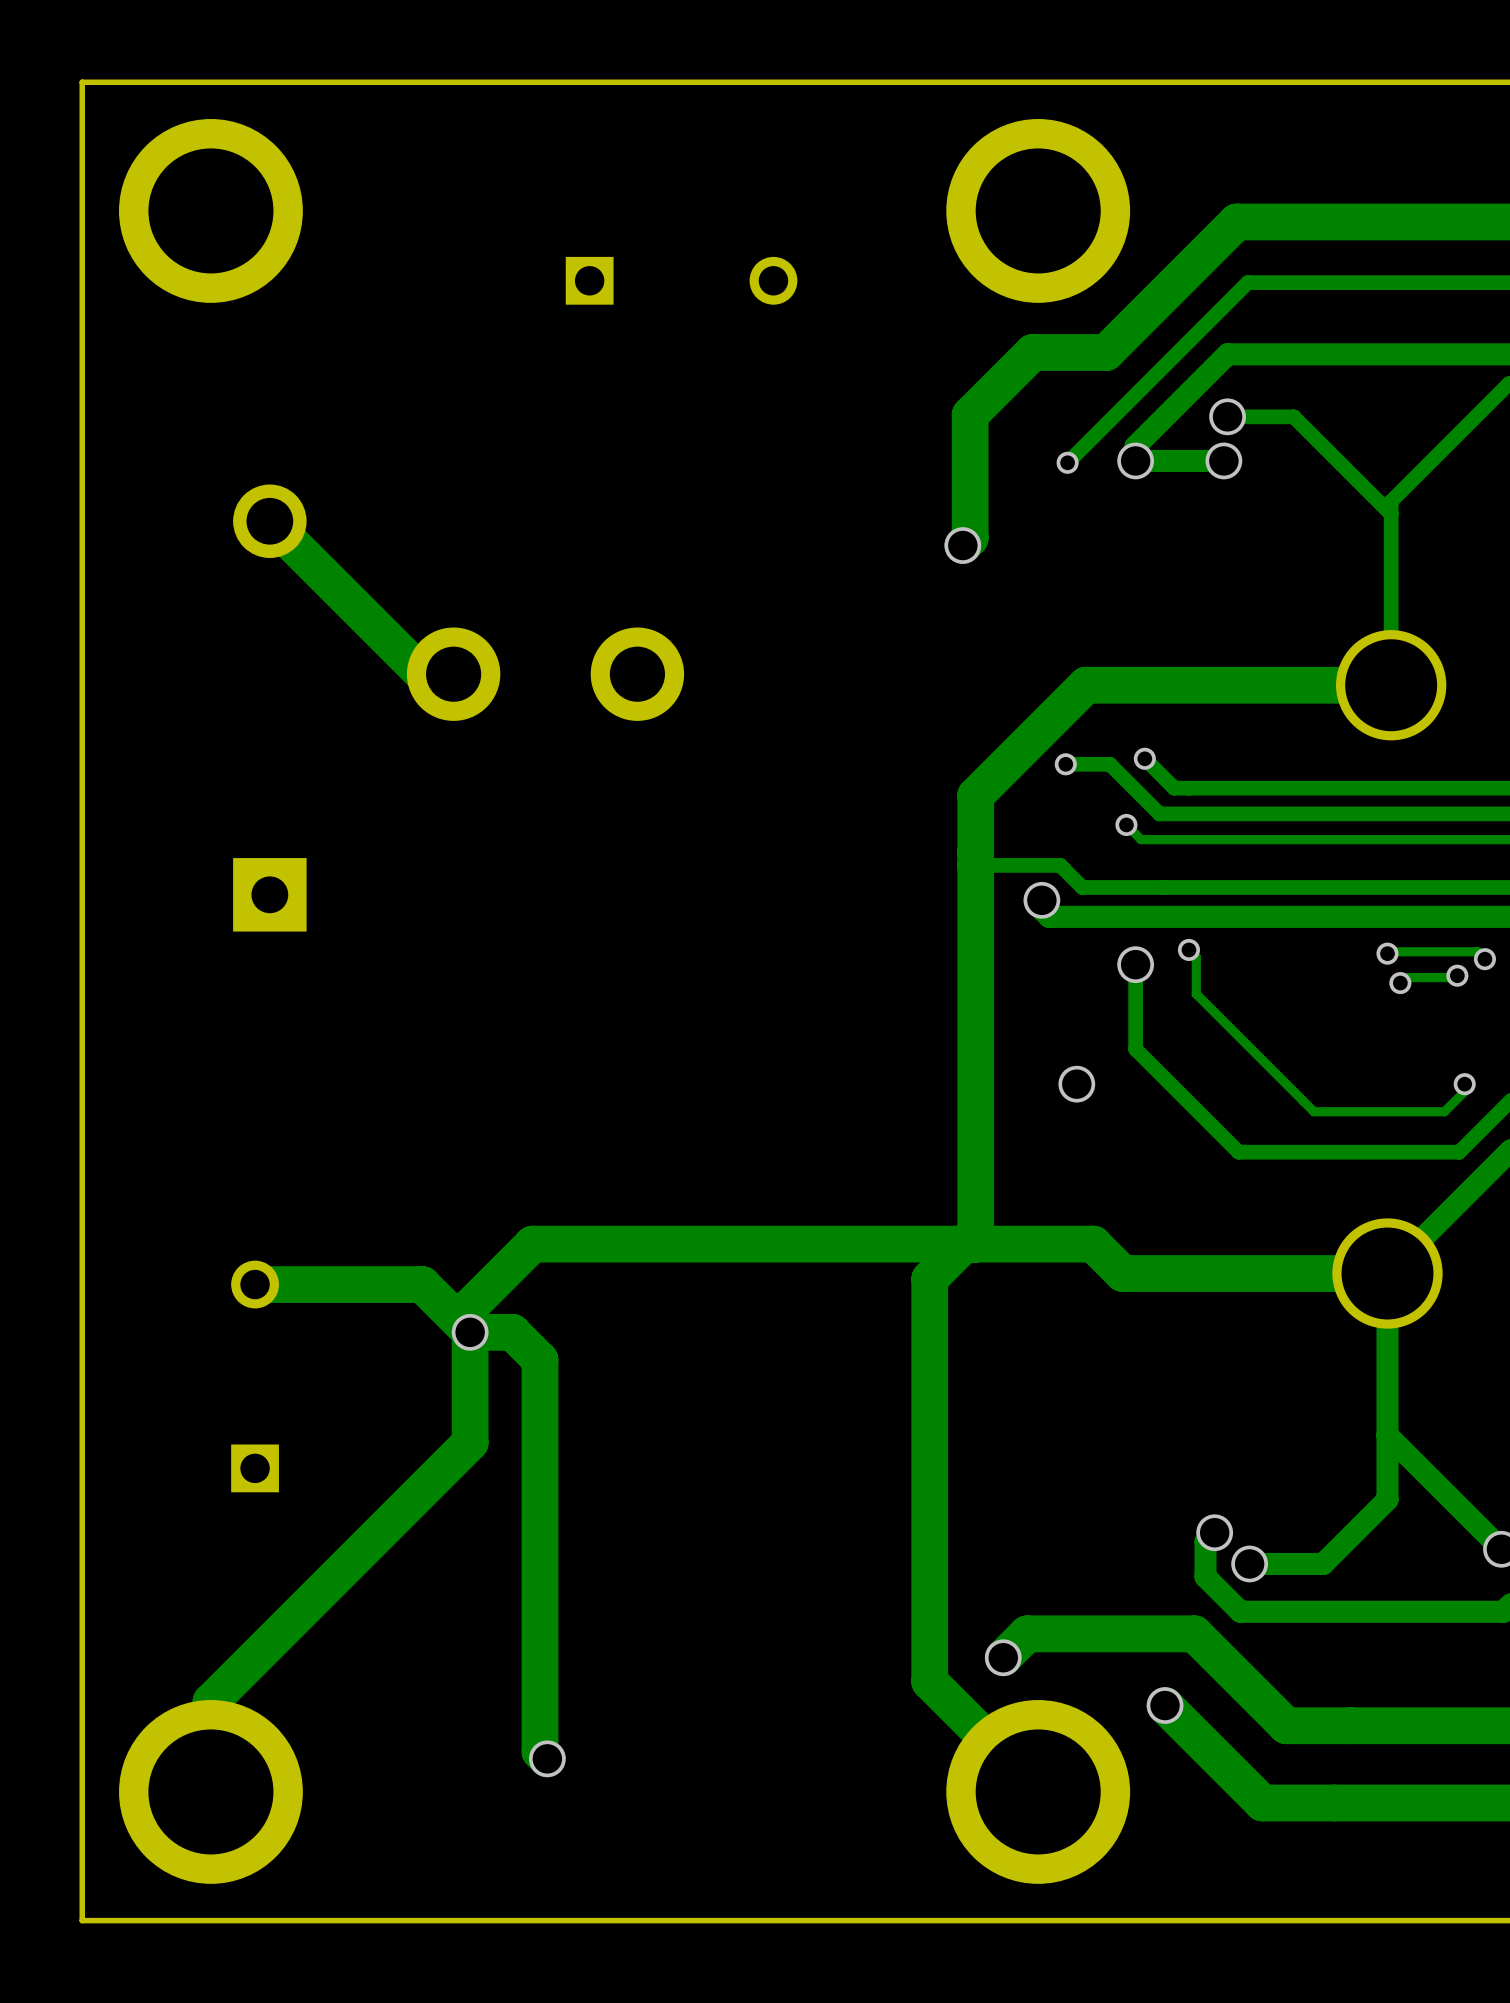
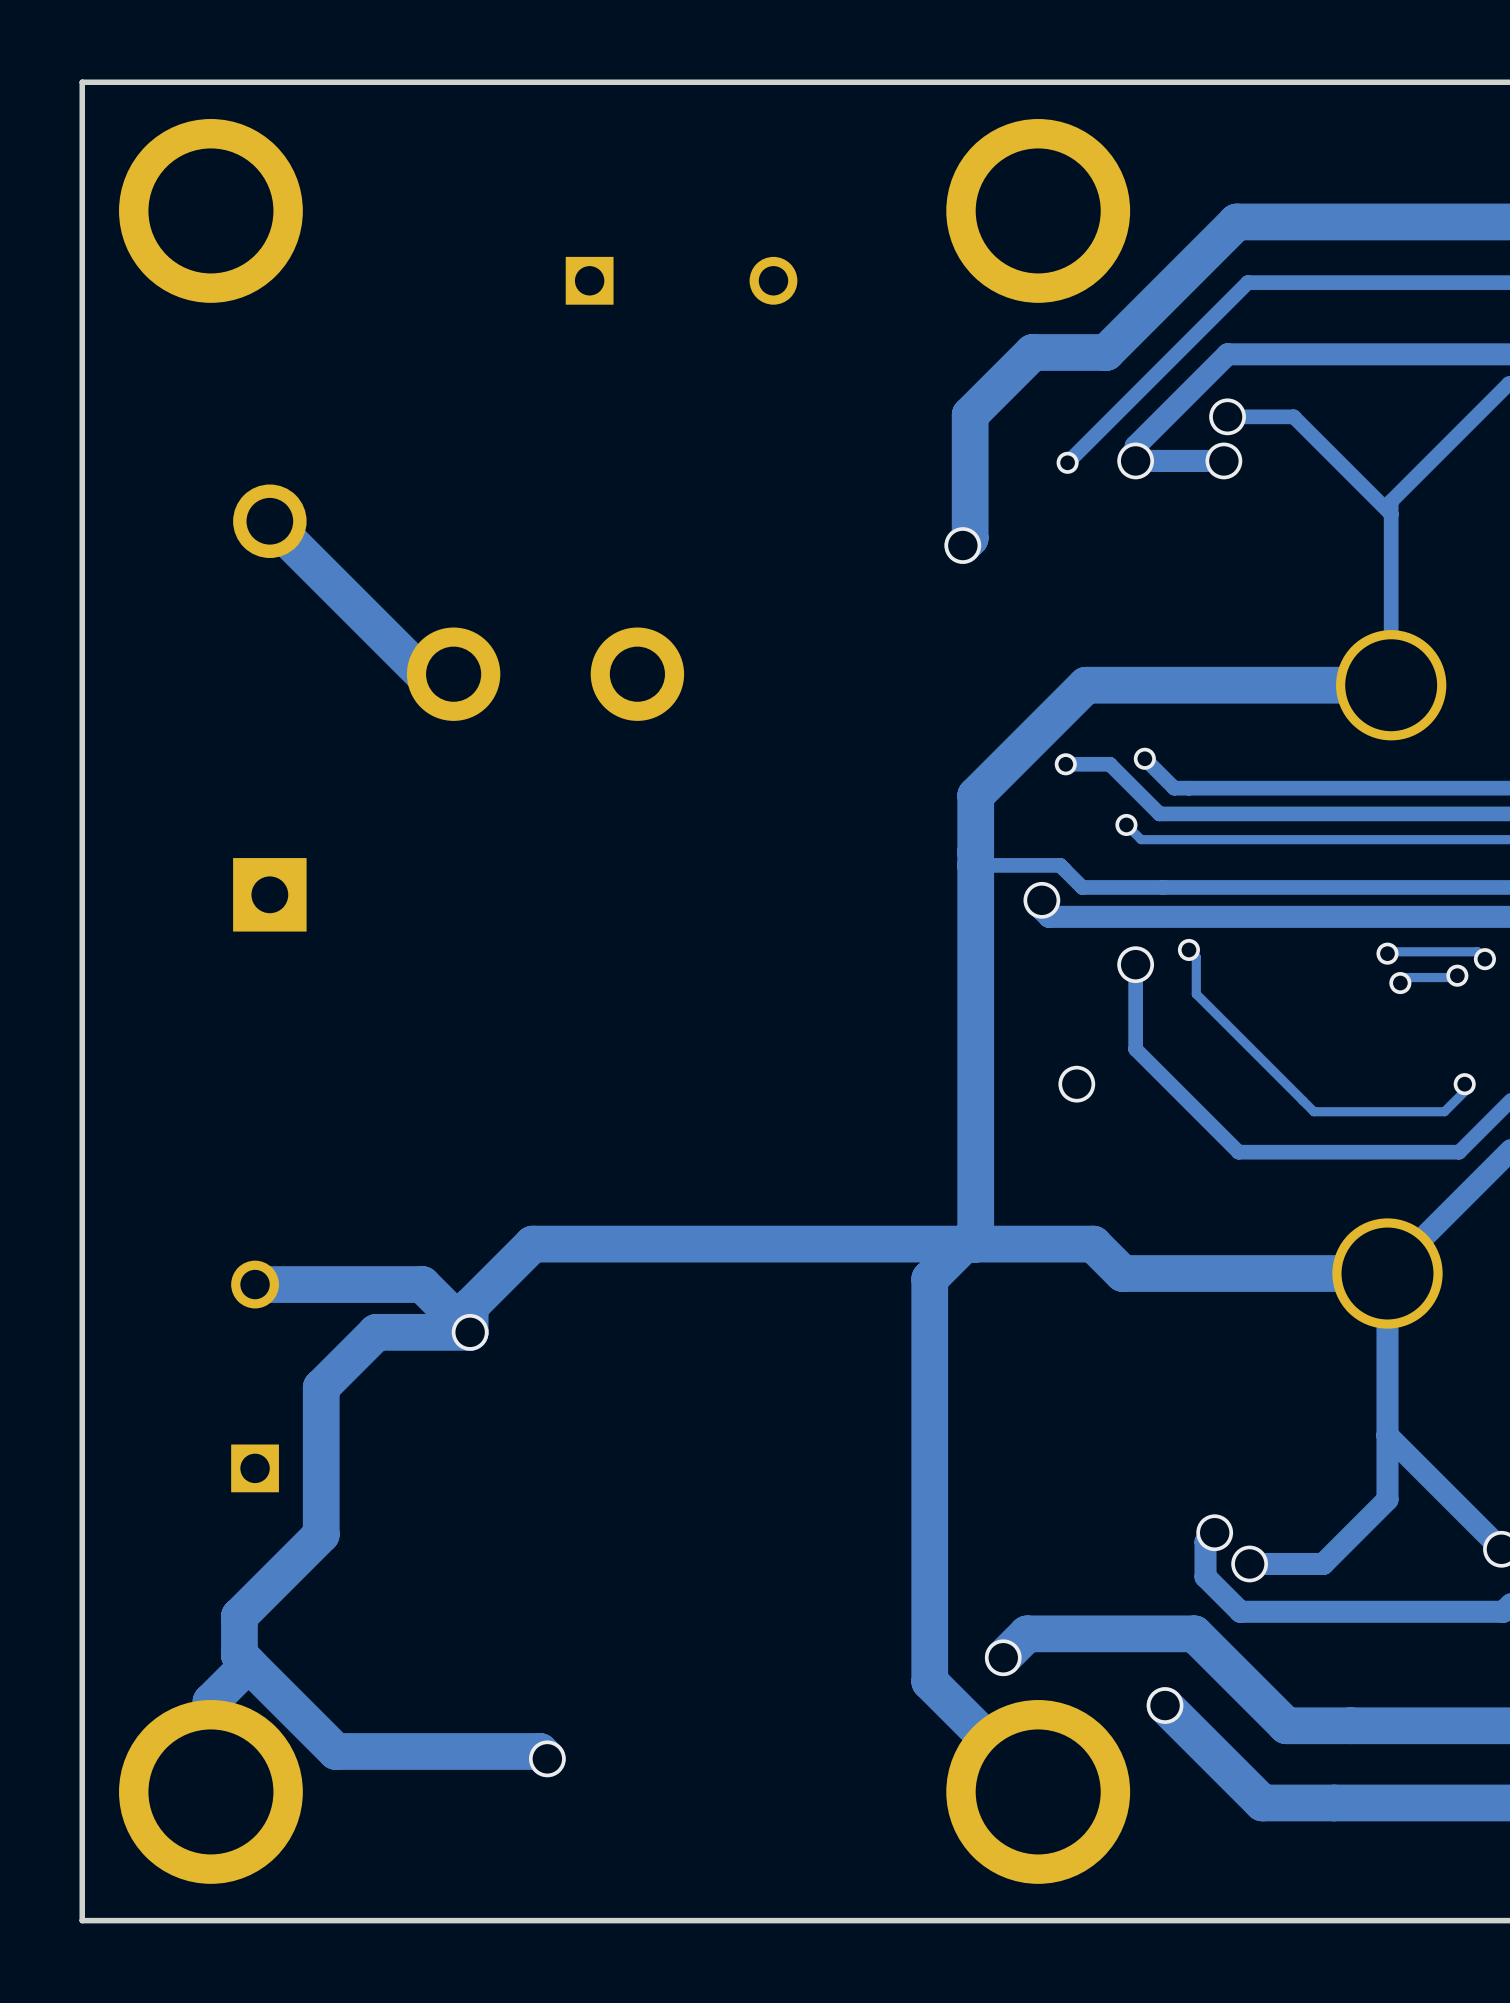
track: (248, 1664) (470, 1442) (470, 1332) (512, 1332) (540, 1359) (540, 1751) -> (470, 1332) (376, 1332) (321, 1387) (321, 1534) (239, 1616) (239, 1654) (335, 1751) (540, 1751)

